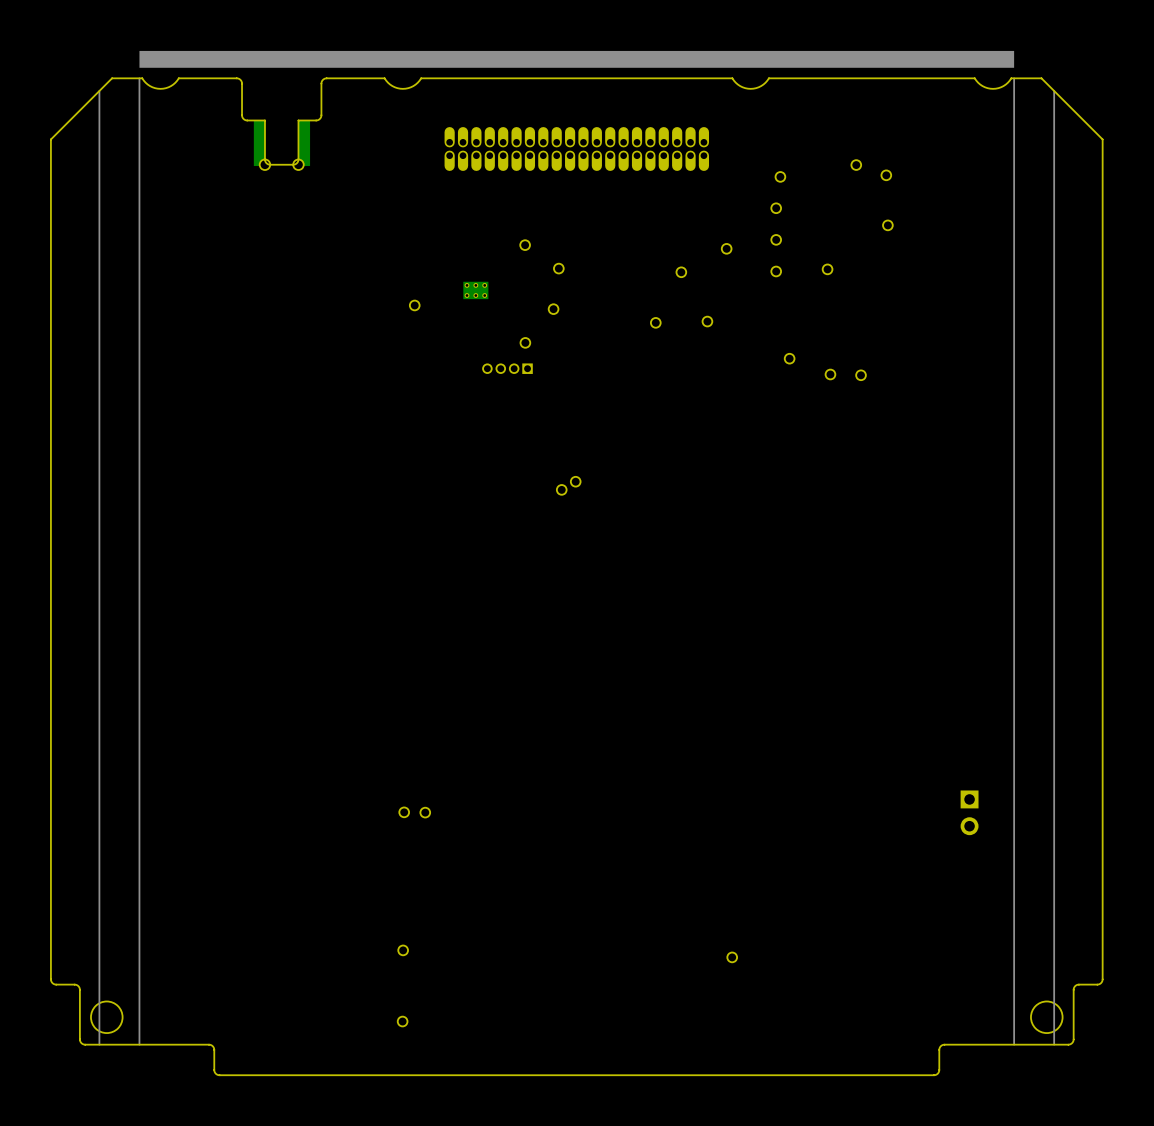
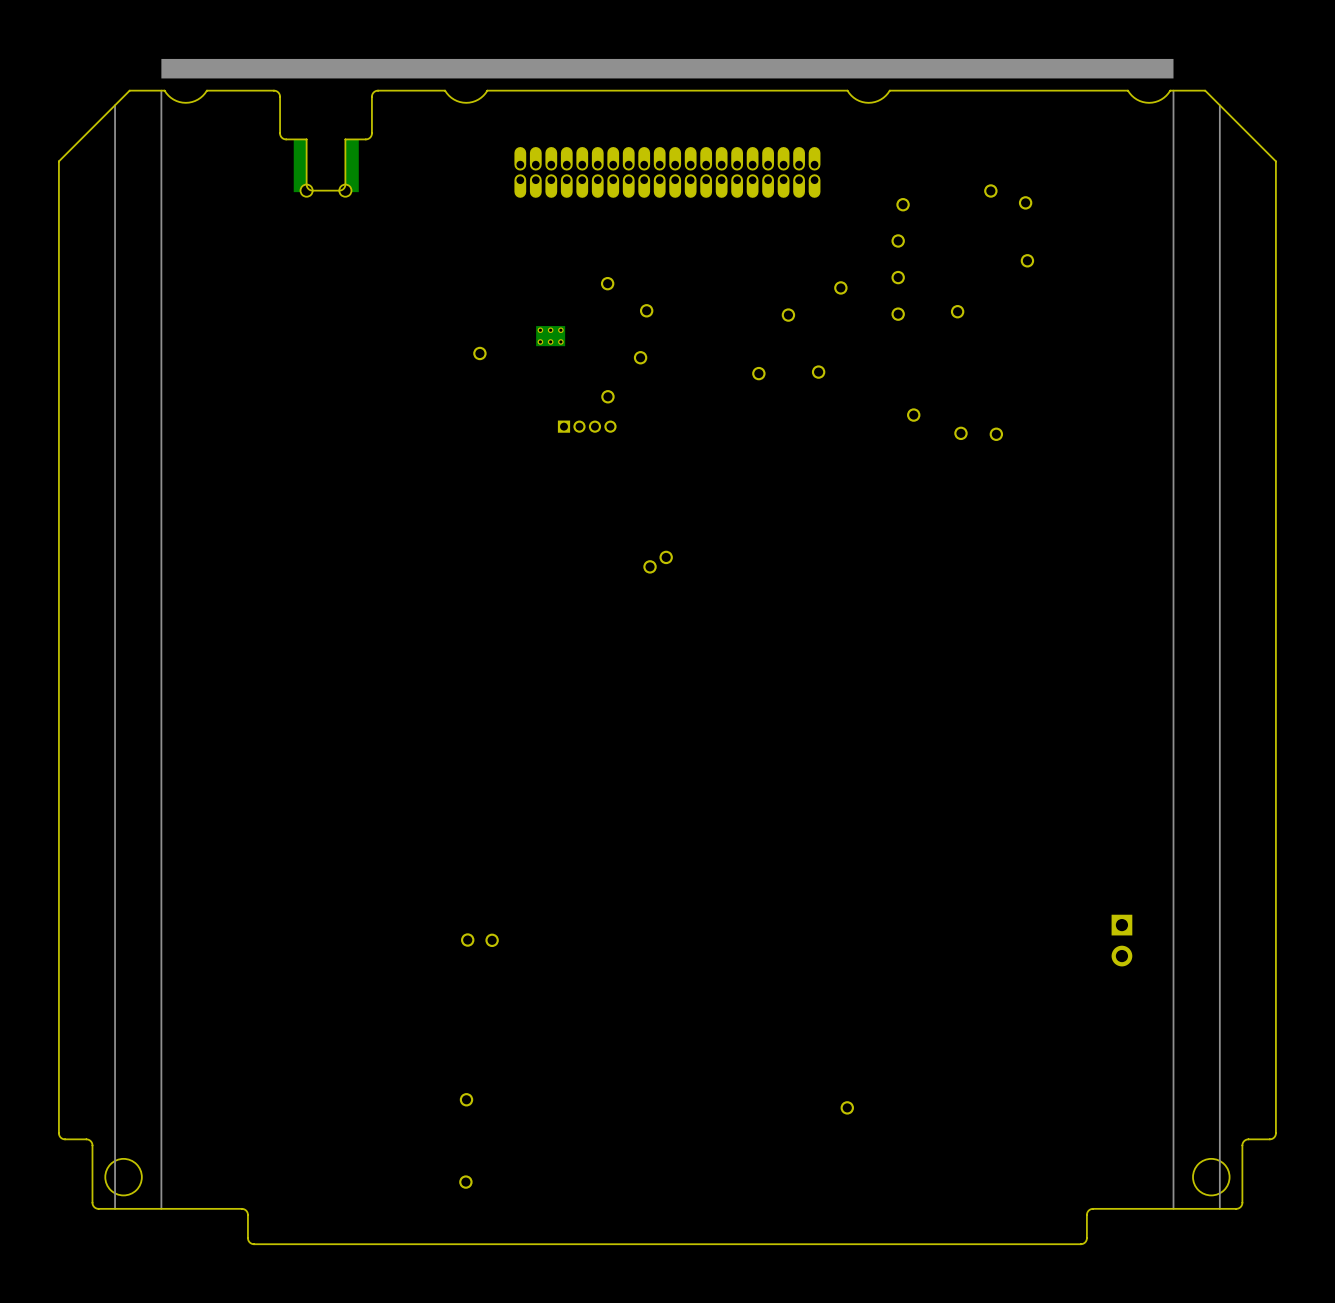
part rotation: 0° (507, 368) -> 180° (587, 426)

